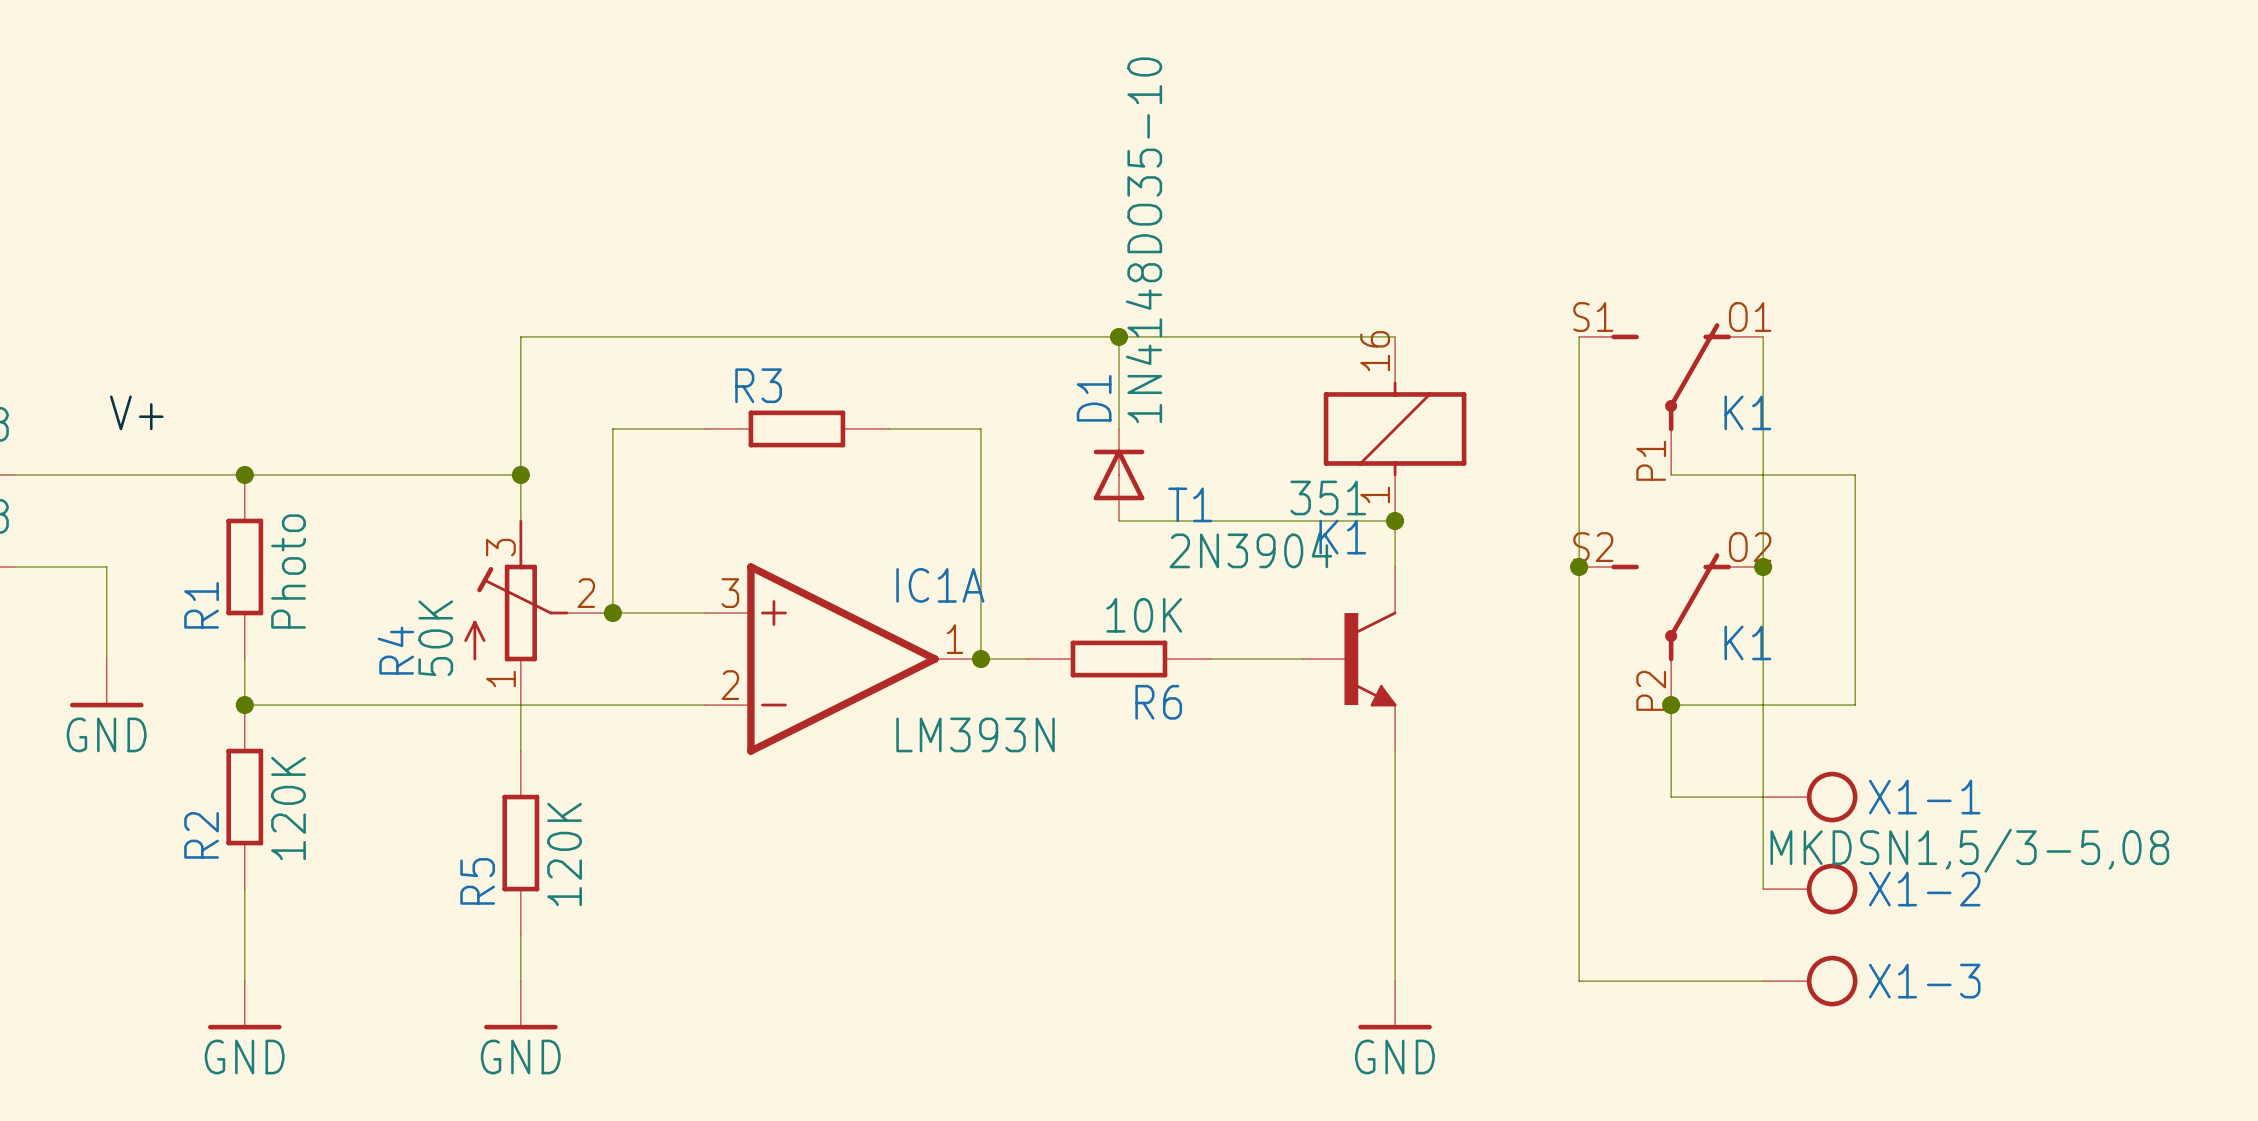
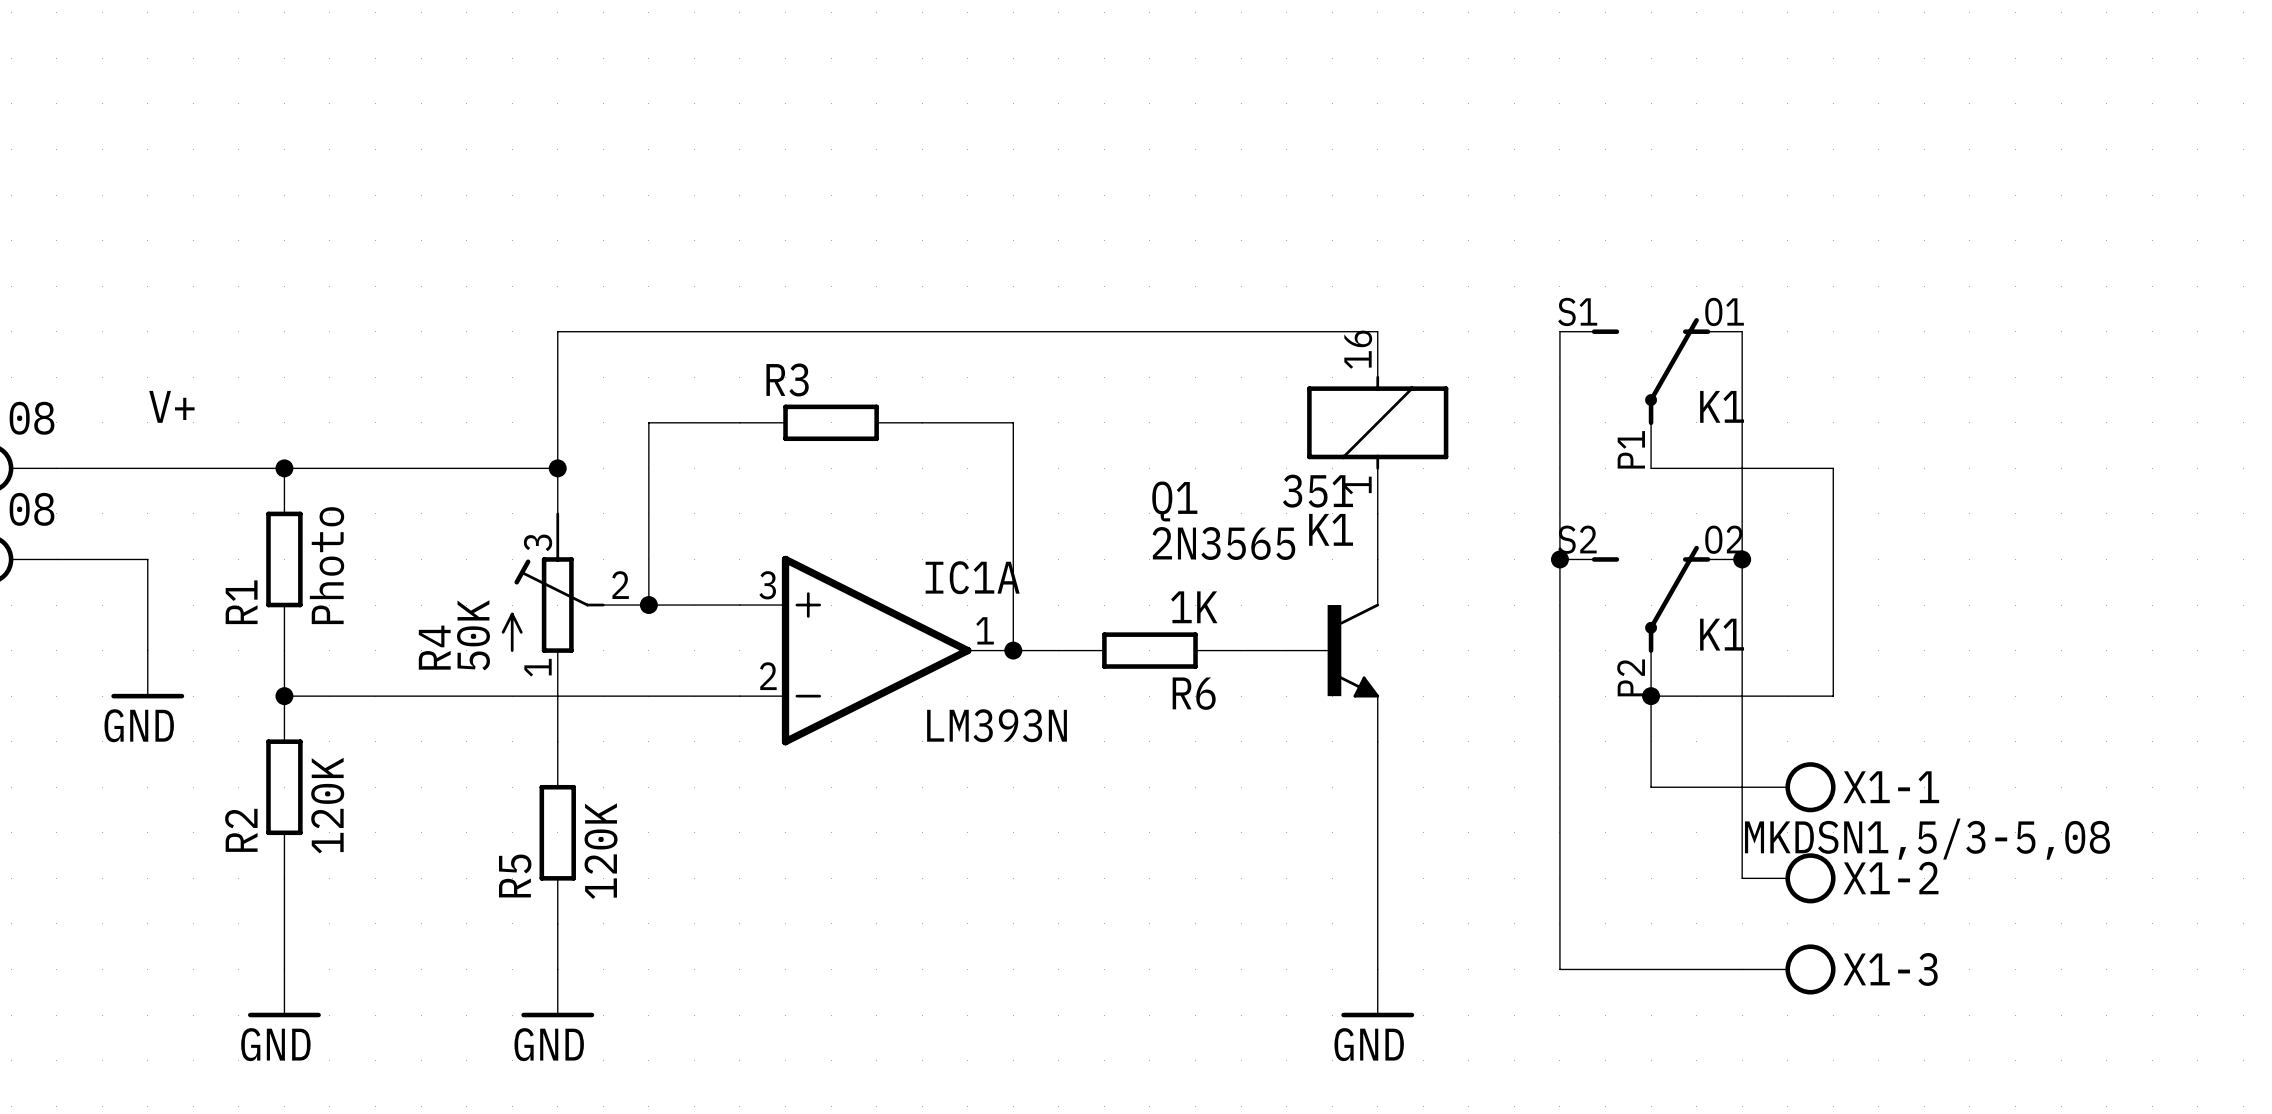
wire: (1119, 336) (1119, 428) -> none
junction: (1119, 336) -> none
wire: (1349, 336) (1395, 336) -> (1651, 468) (1696, 468)
wire: (1579, 336) (1579, 981) -> (1559, 331) (1559, 969) (1605, 969)
wire: (1763, 336) (1763, 889) -> (1742, 331) (1742, 878)
K1 position: (1671, 399) -> (1651, 393)
K1 position: (1395, 428) -> (1377, 422)
D1: 1N4148DO35-10 (1119, 474) -> none
wire: (1809, 474) (1855, 474) (1855, 705) (1809, 705) -> (1833, 468) (1833, 696)
wire: (1119, 520) (1395, 520) (1395, 567) -> none
wire: none -> (1377, 513) (1377, 559)
junction: (1395, 520) -> none
junction position: (1579, 567) -> (1559, 559)
junction position: (1763, 567) -> (1742, 559)
R6 value: 10K (1144, 615) -> 1K (1194, 607)
K1 position: (1671, 629) -> (1651, 620)
Q1: none -> 2N3565 (1332, 650)
T1: 2N3904 (1349, 659) -> none
wire: (1671, 705) (1671, 797) -> (1696, 696) (1651, 696) (1651, 787) (1696, 787)
junction position: (1671, 705) -> (1651, 696)
wire: (1395, 751) (1395, 981) -> (1377, 741) (1377, 969)
X1-1 position: (1810, 797) -> (1788, 787)
X1-2 position: (1810, 889) -> (1788, 878)
X1-3 position: (1810, 981) -> (1788, 969)
power symbol position: GND (1395, 1005) -> GND (1377, 993)

